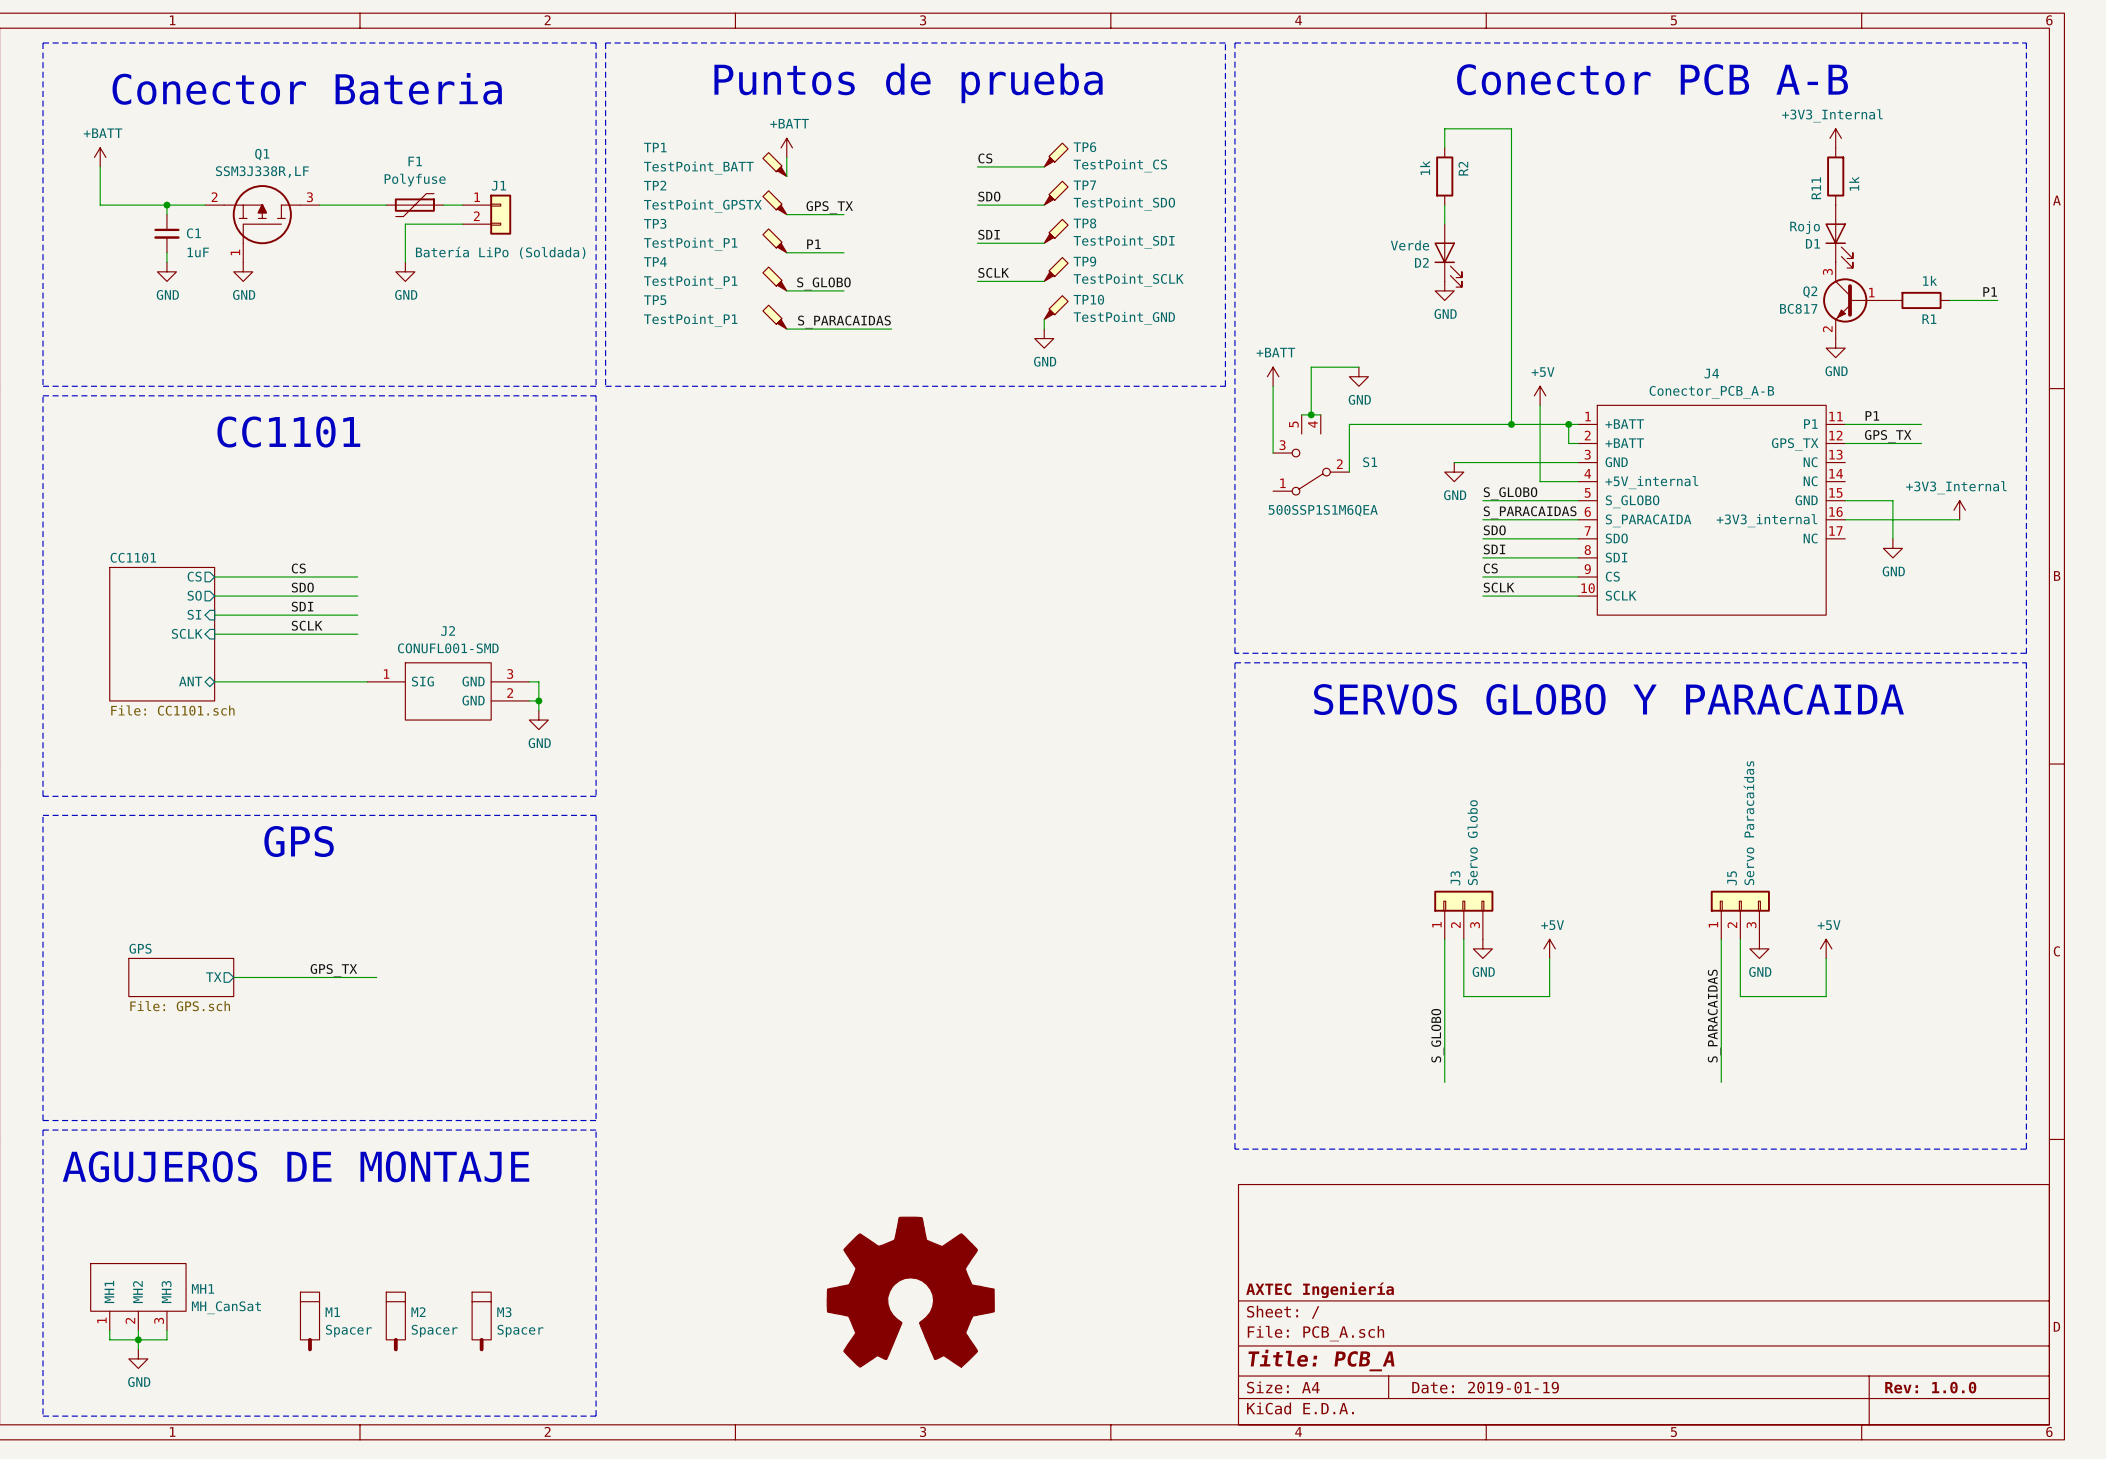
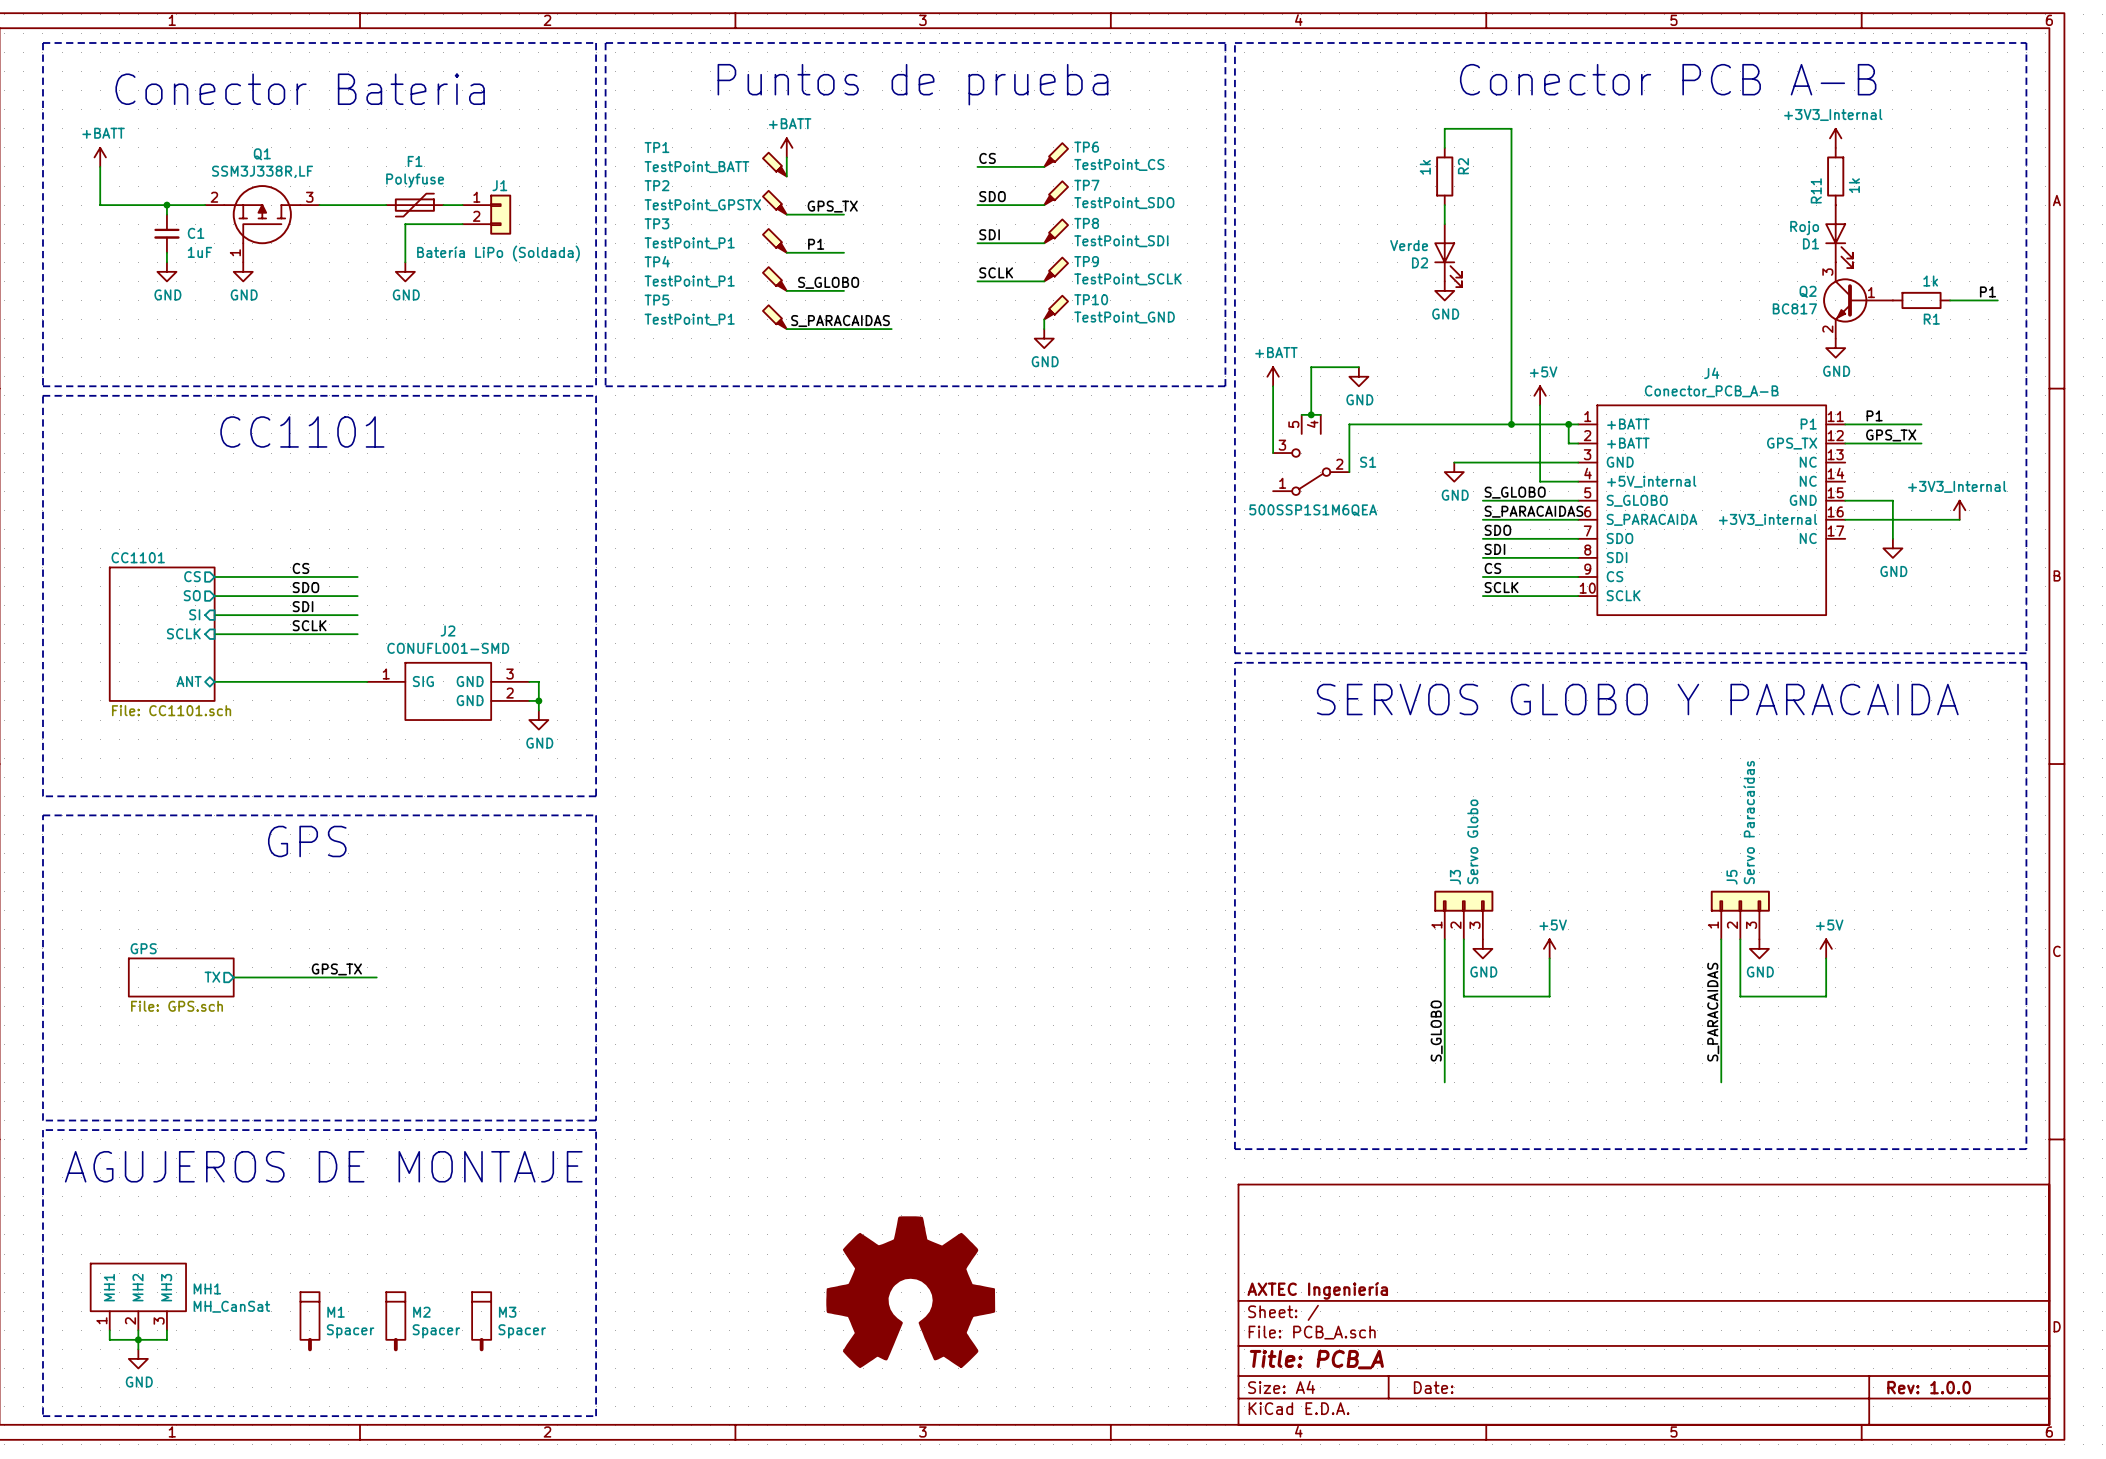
title block: Date: 2019-01-19 (1485, 1387) -> Date: (1433, 1387)

